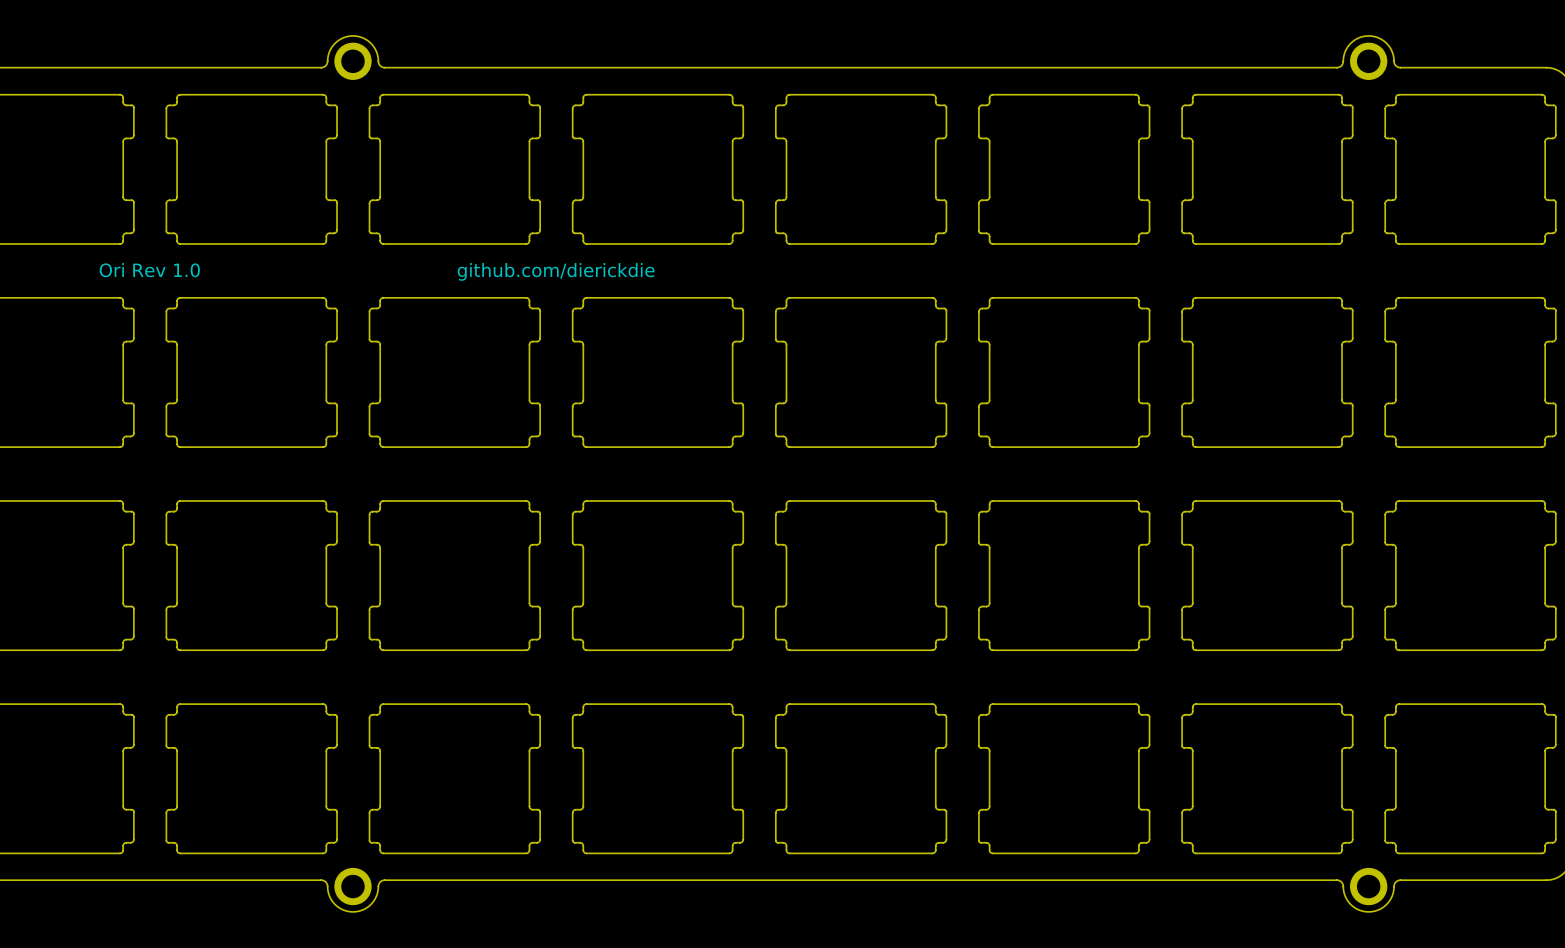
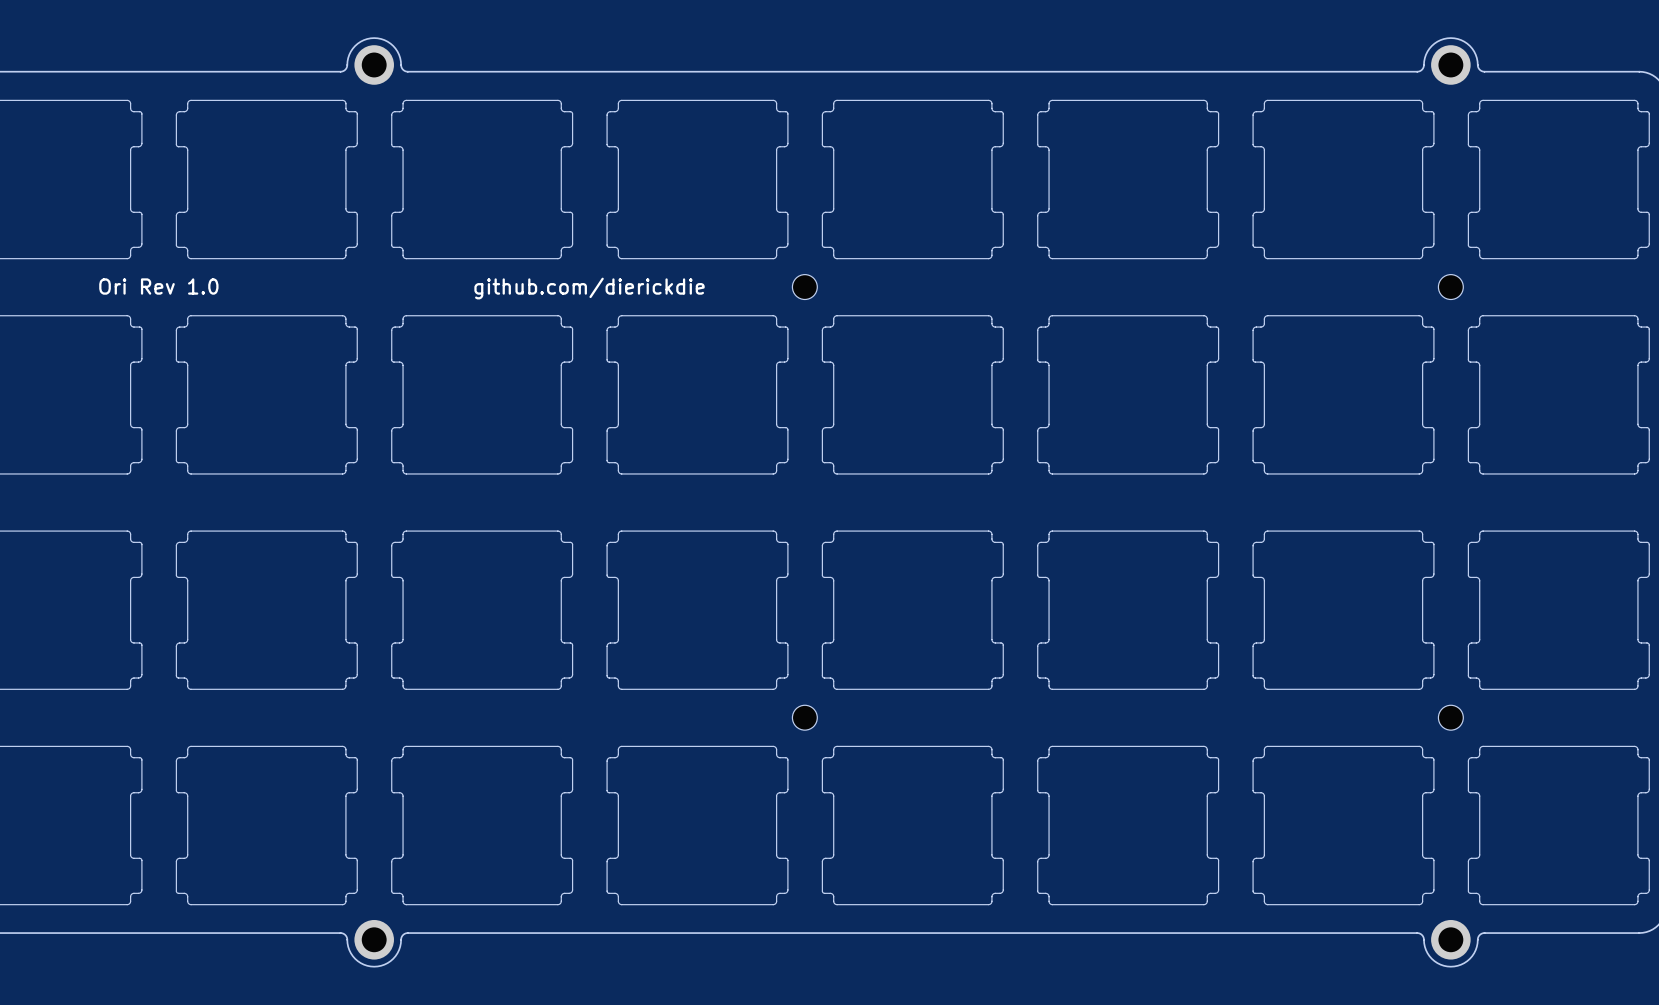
part: none -> (804, 287)
part: none -> (1450, 287)
part: none -> (804, 717)
part: none -> (1450, 717)

